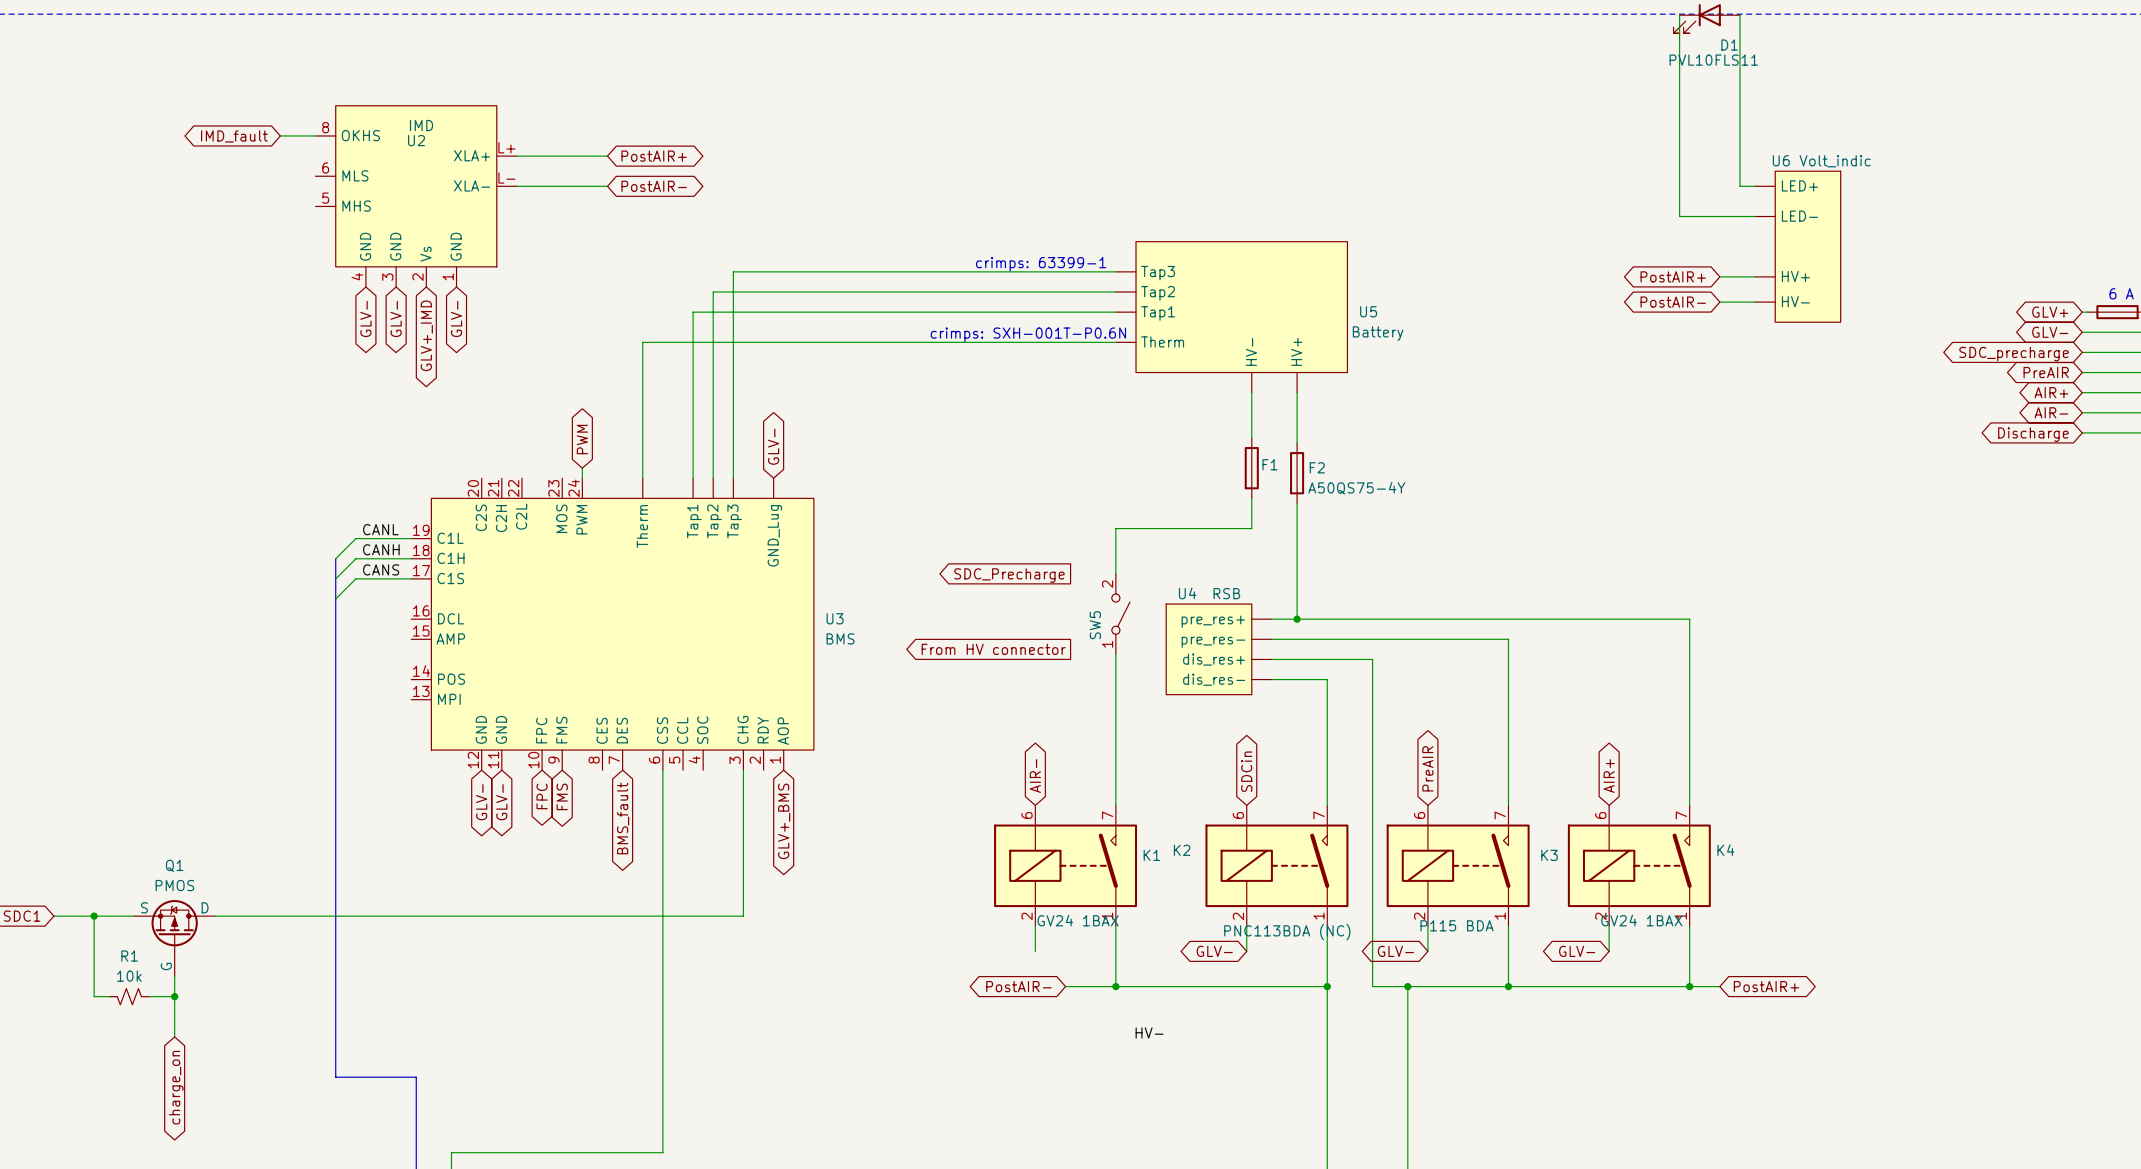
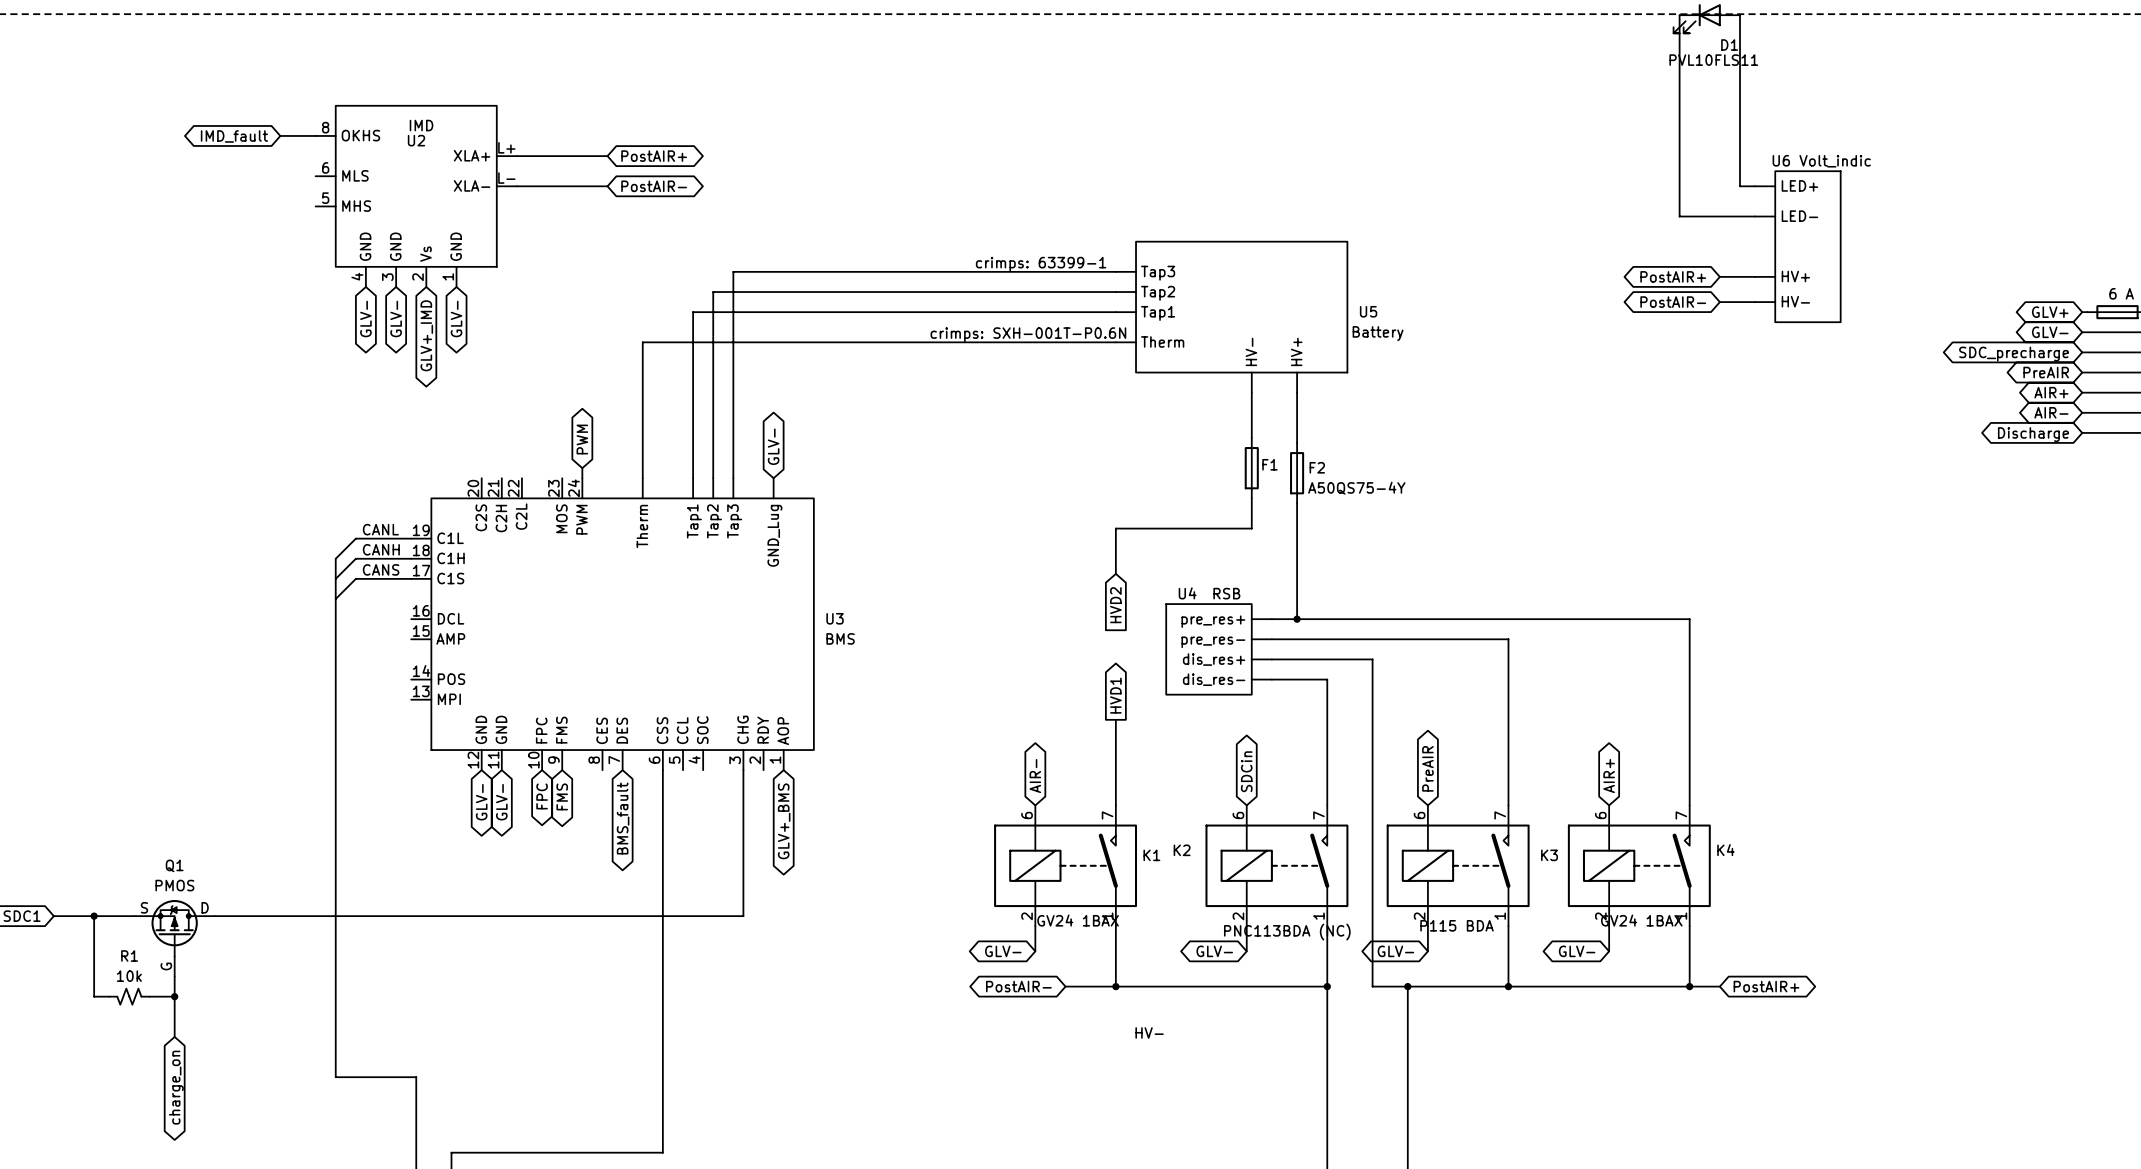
global label: SDC_Precharge (1009, 575) -> none
global label: none -> HVD2 (1115, 605)
SW5: (1120, 614) -> none
global label: From HV connector (993, 649) -> none
wire: (1115, 654) (1115, 719) -> none
global label: none -> HVD1 (1115, 695)
global label: none -> GLV- (1003, 951)

